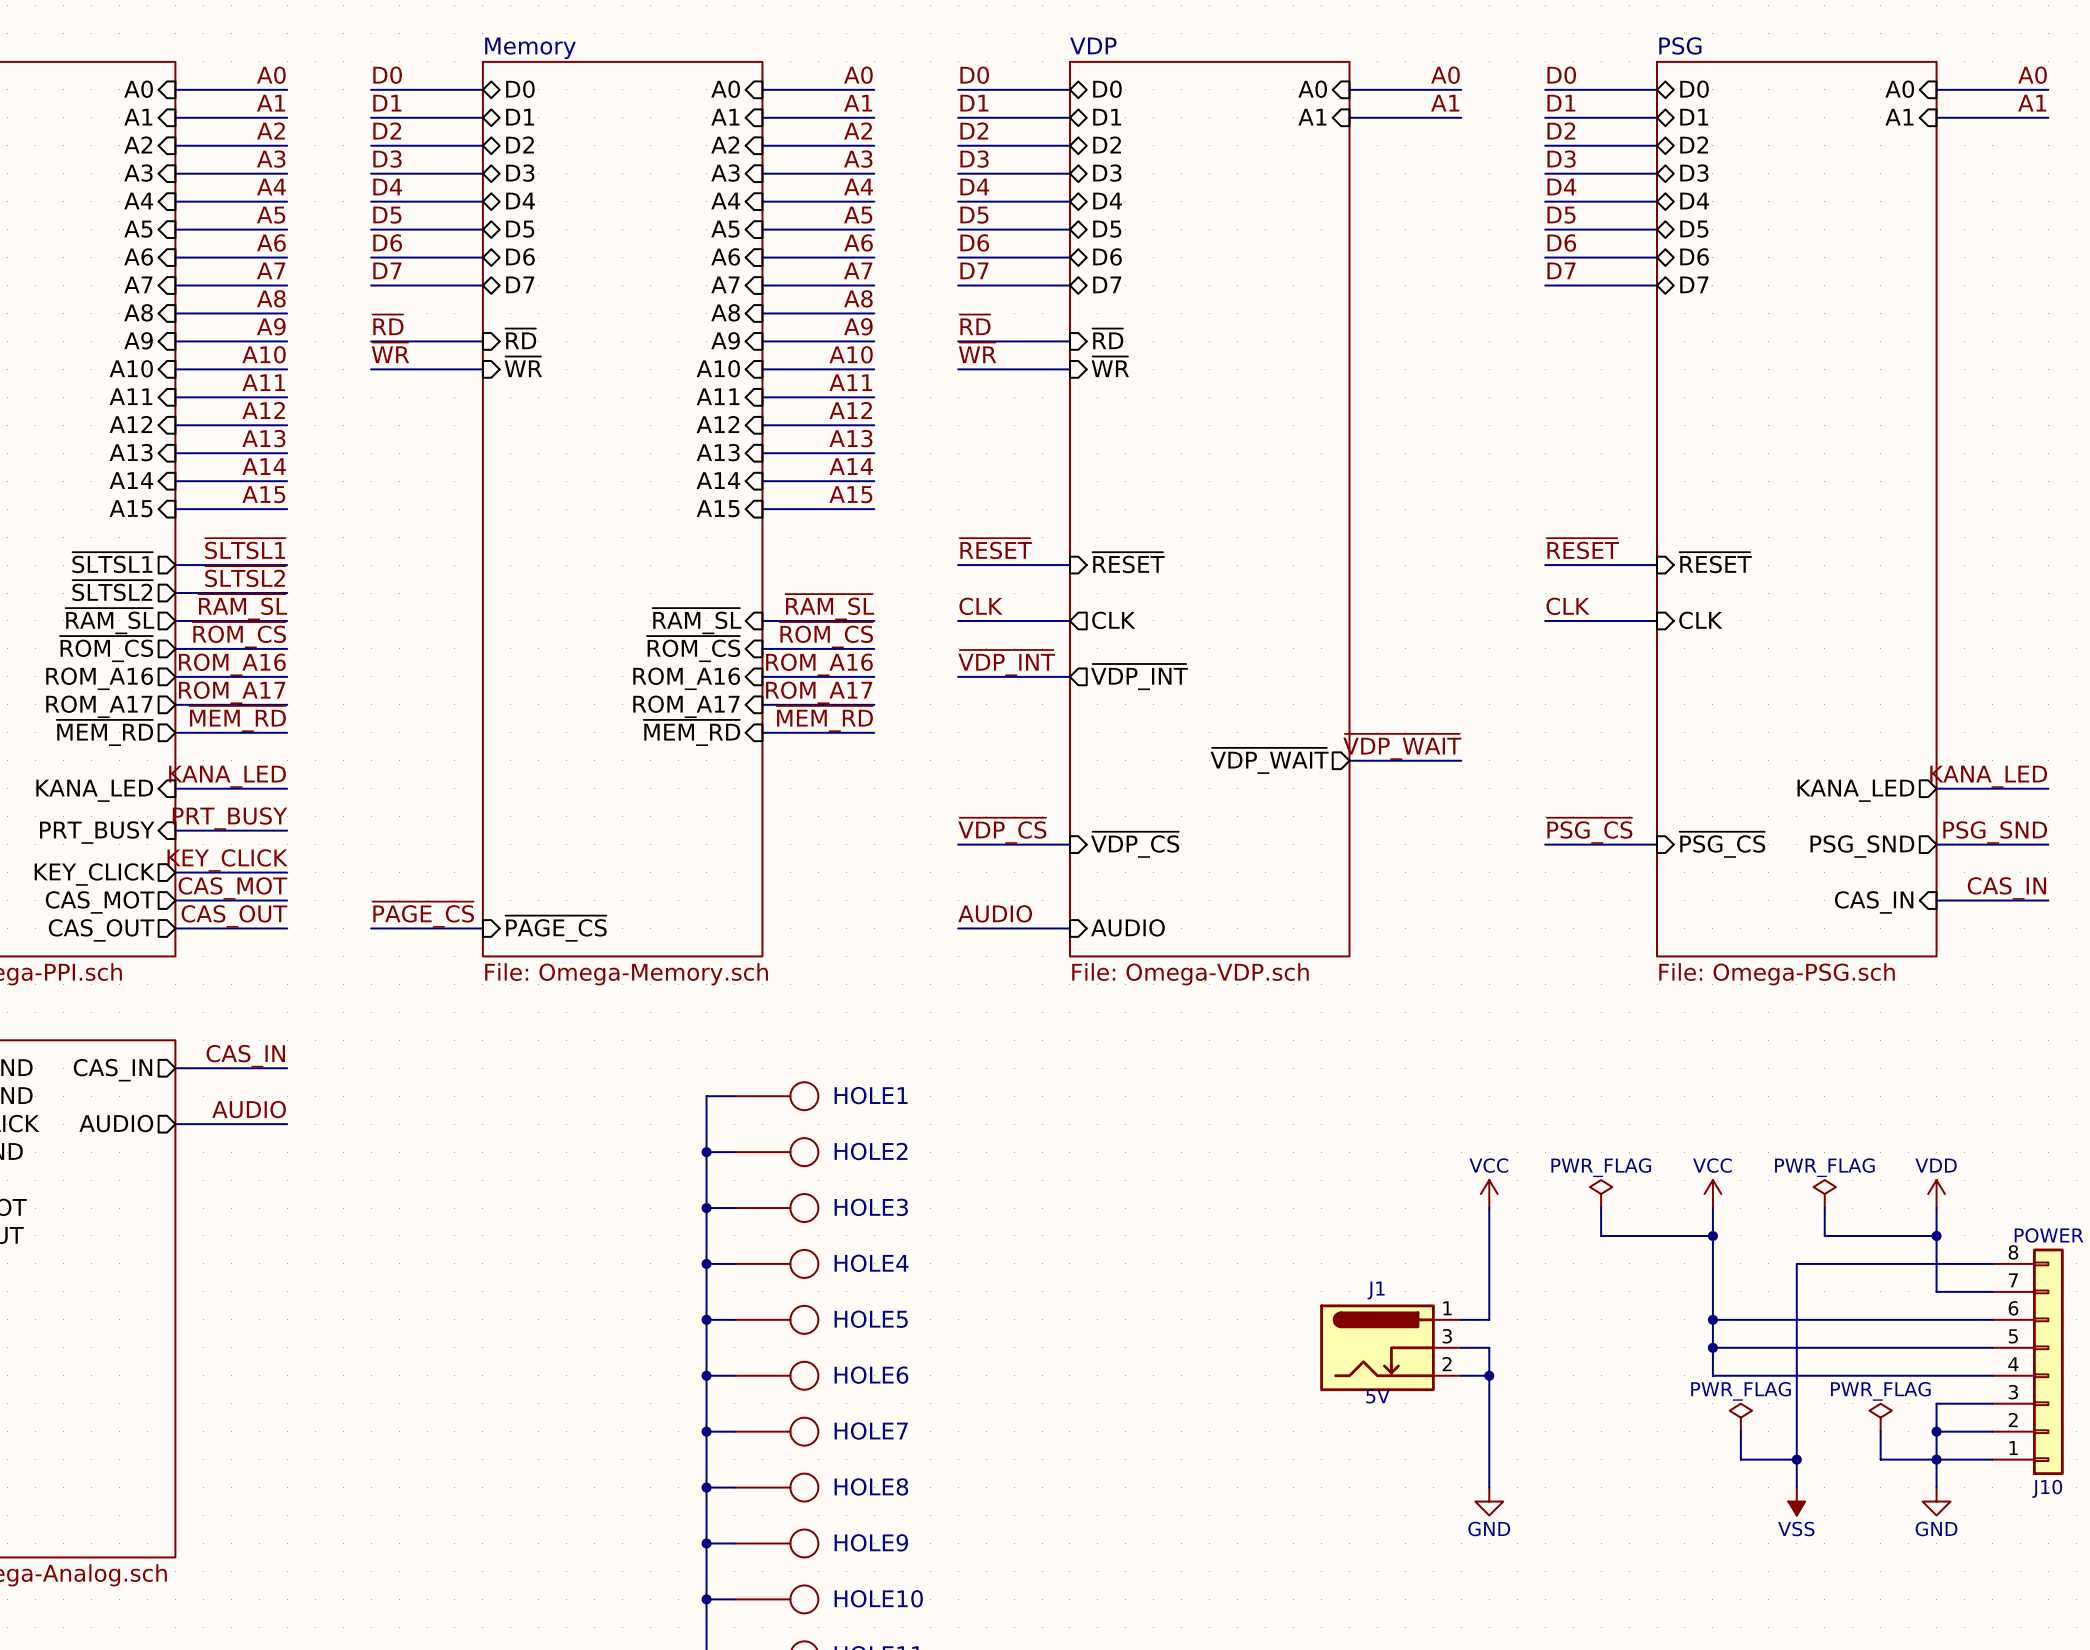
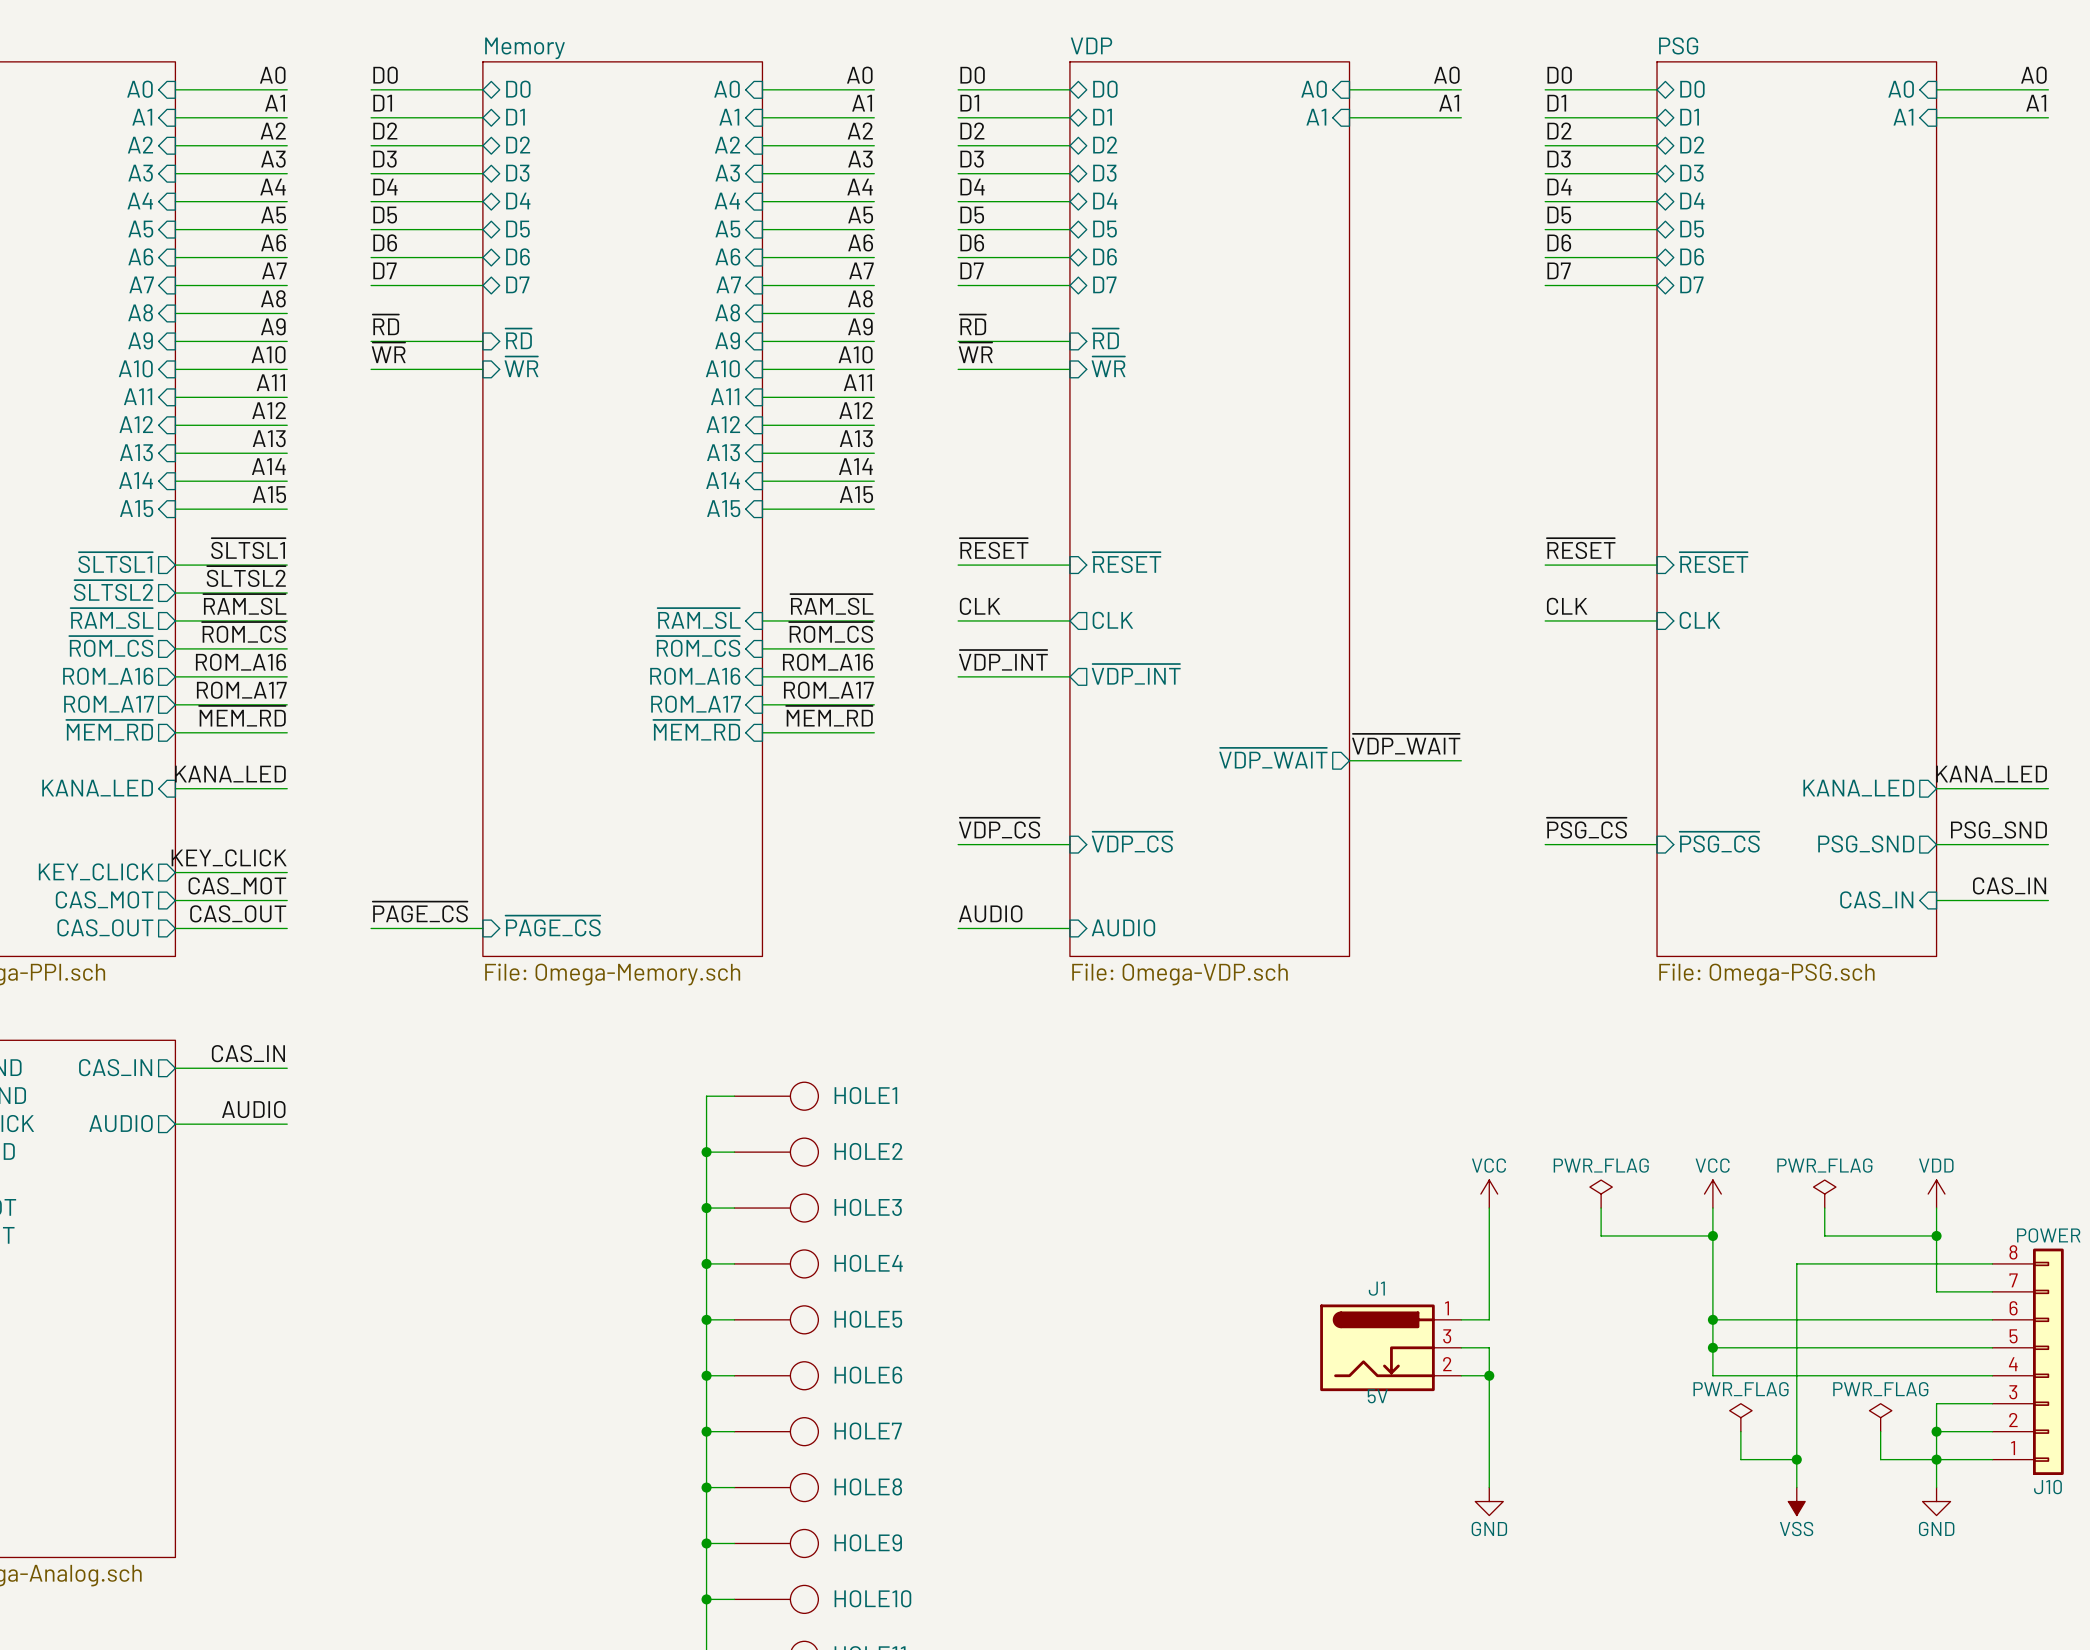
label: PRT_BUSY (230, 818) -> none
wire: (175, 830) (287, 830) -> none
sheet pin: PRT_BUSY (97, 832) -> none

